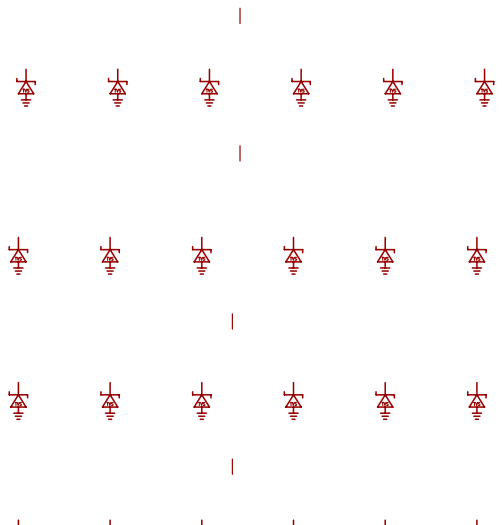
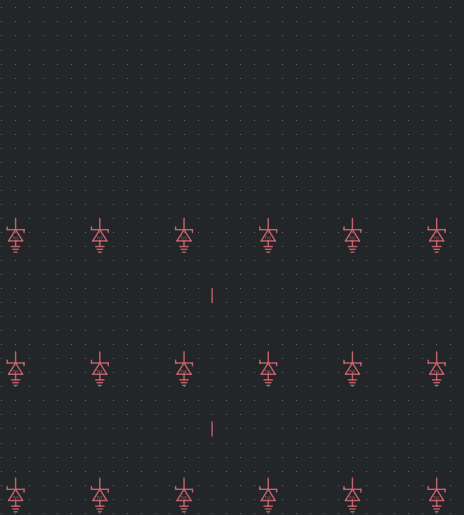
part: (240, 15) -> none
part: (26, 87) -> none
part: (117, 87) -> none
part: (209, 87) -> none
part: (301, 87) -> none
part: (392, 87) -> none
part: (484, 87) -> none
part: (240, 153) -> none

